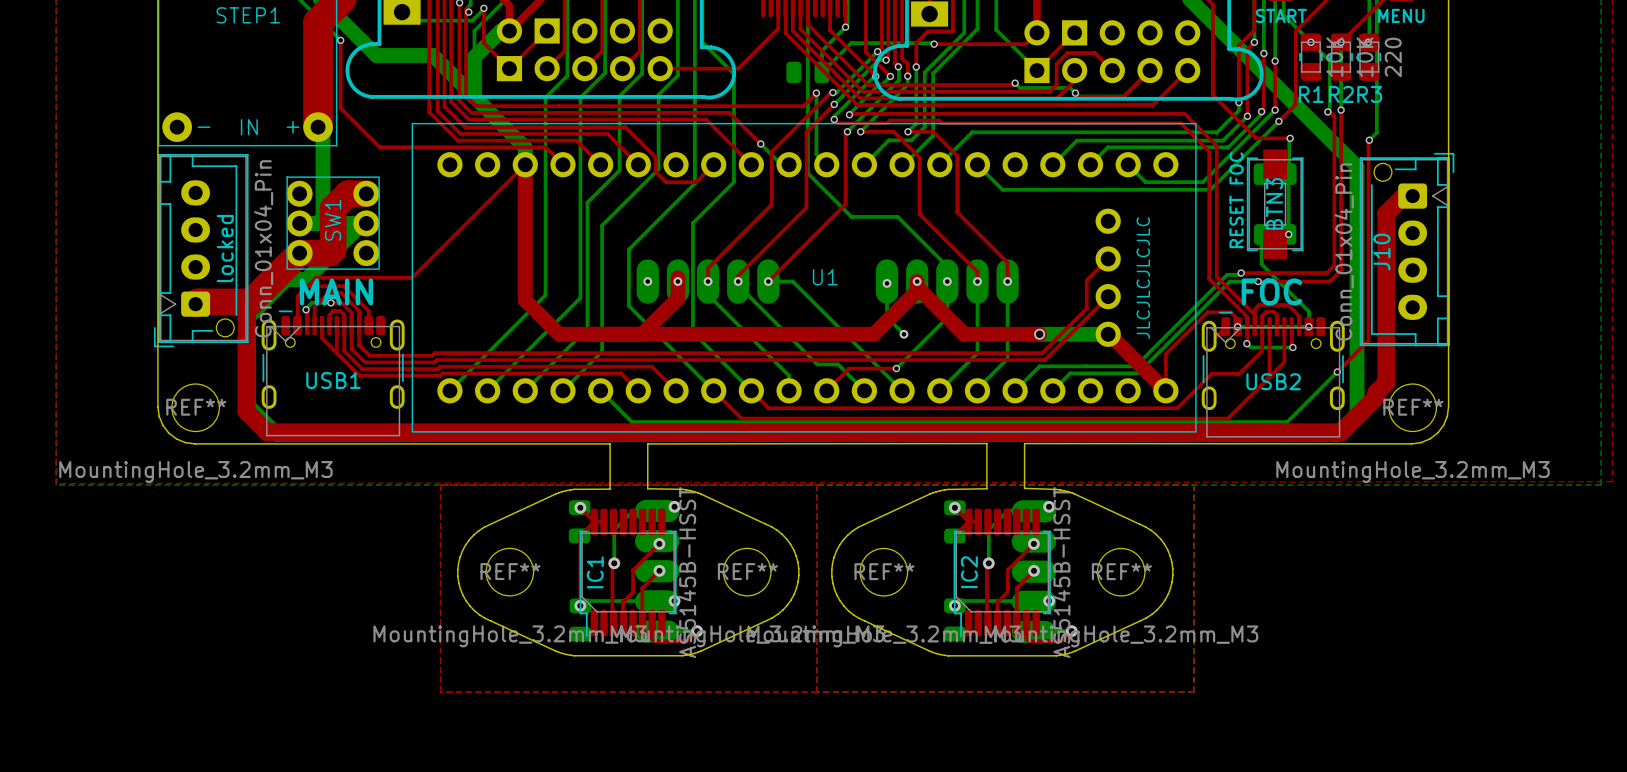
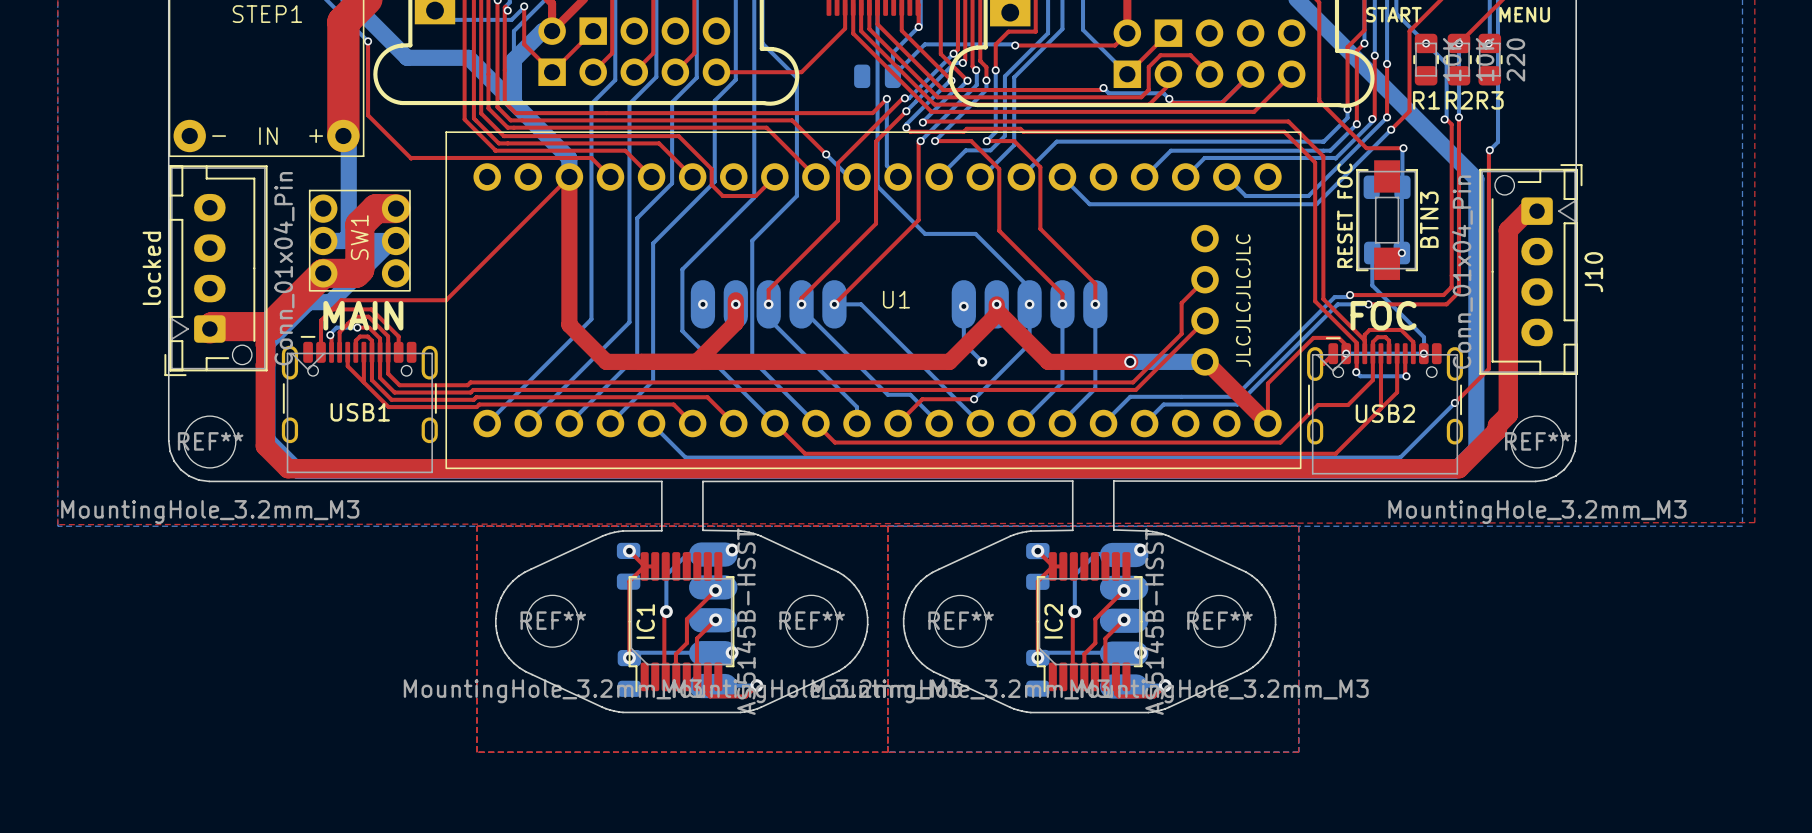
BTN3 name position: BTN3 (1274, 203) -> BTN3 (1429, 219)
locked name position: locked (225, 248) -> locked (151, 268)
J10 name position: J10 (1381, 252) -> J10 (1593, 272)

